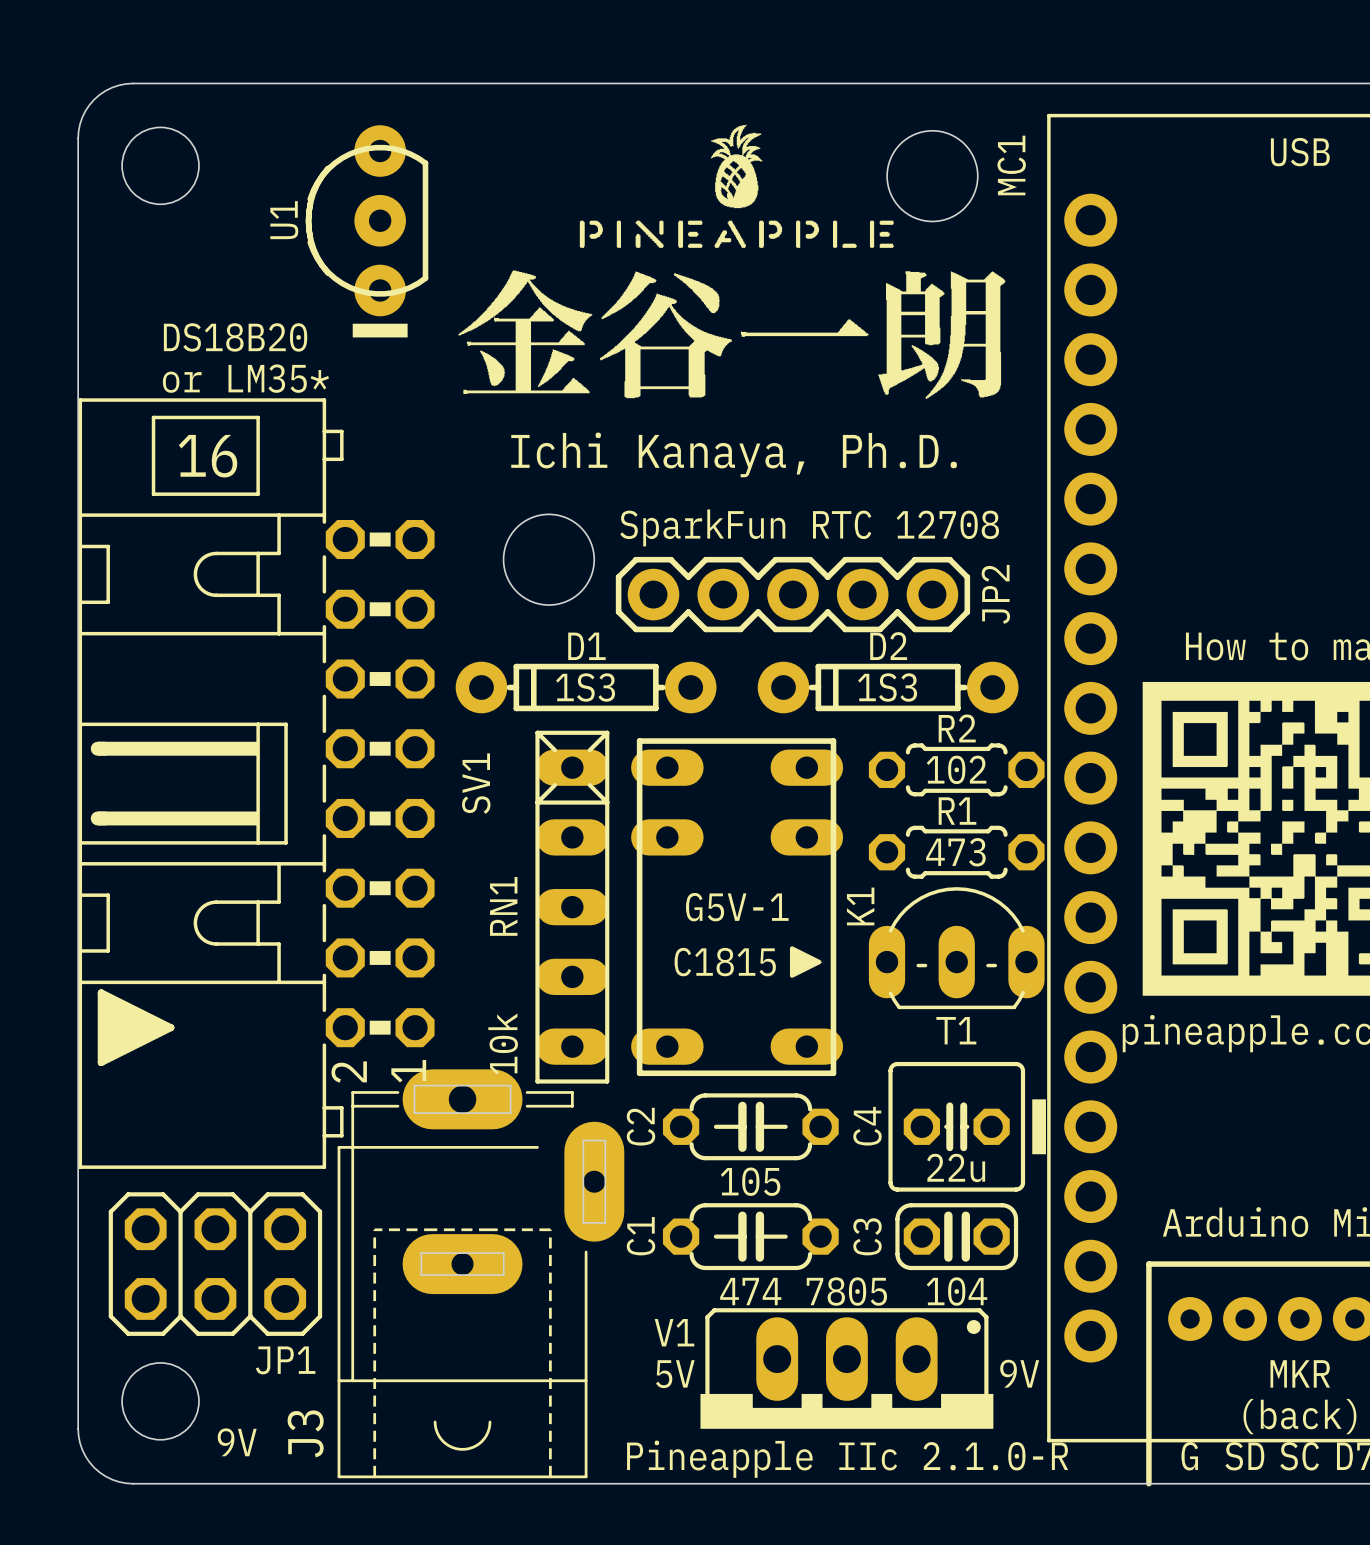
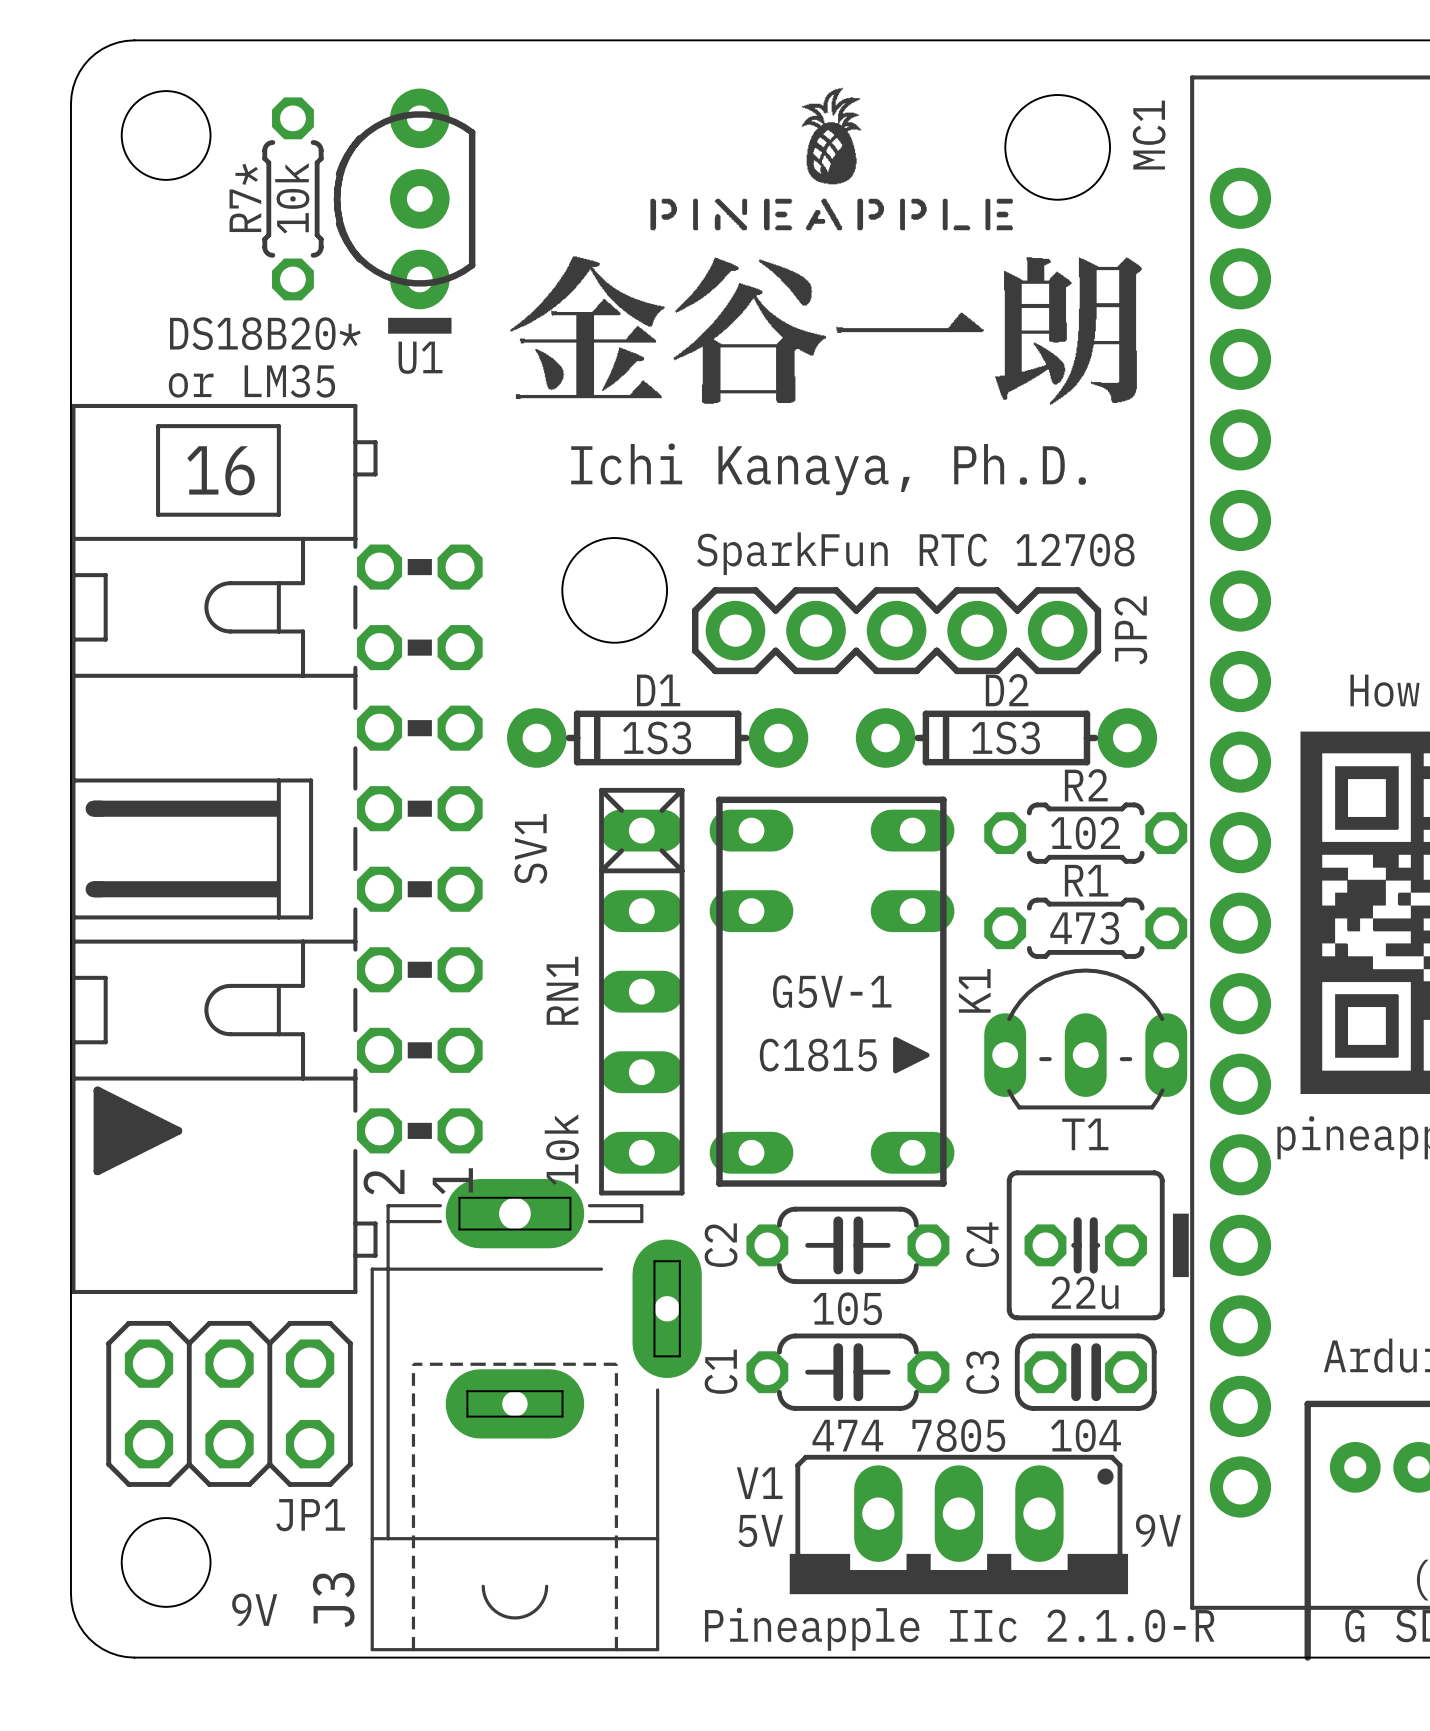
text: none -> 10k (292, 198)
R7*: none -> (292, 198)
U1 name rotation: 0° (284, 220) -> 90° clockwise (420, 357)
U1 name position: U1 (284, 220) -> U1 (420, 357)
text: DS18B20 (235, 337) -> DS18B20* (265, 333)
text: or LM35* (245, 378) -> or LM35 (251, 381)

